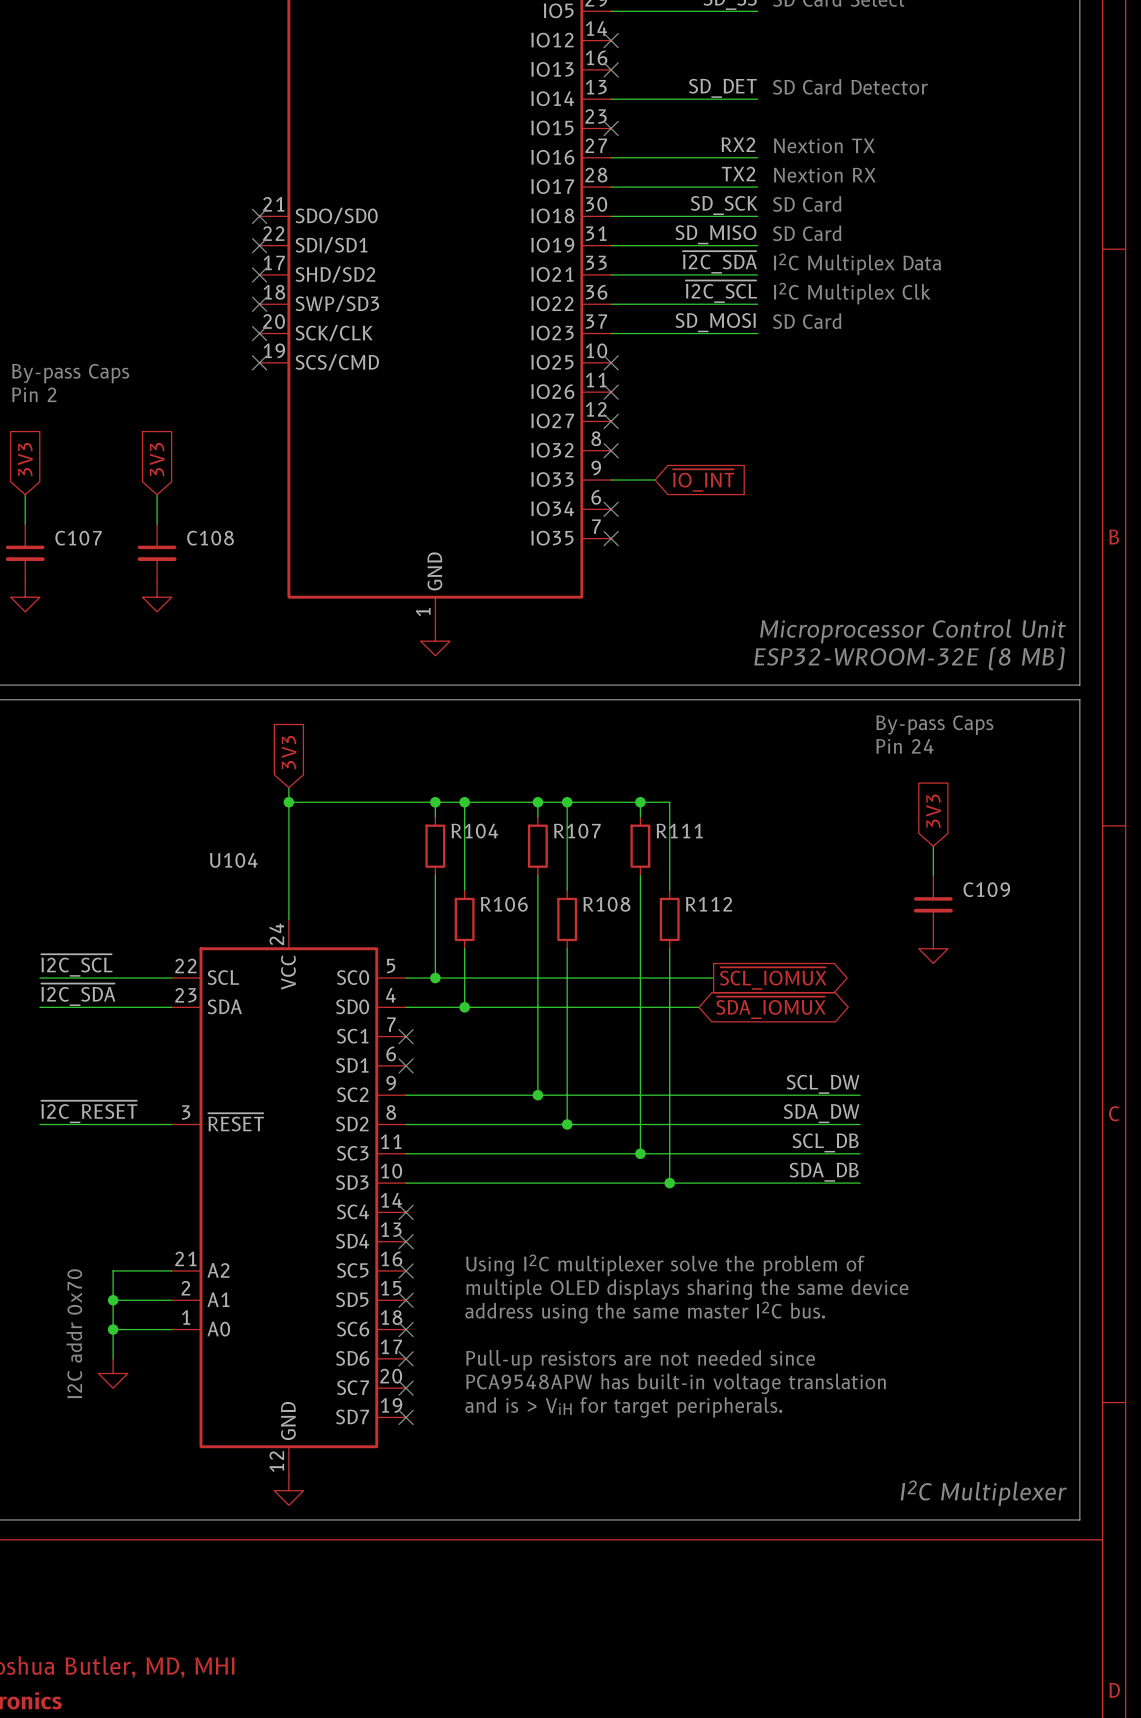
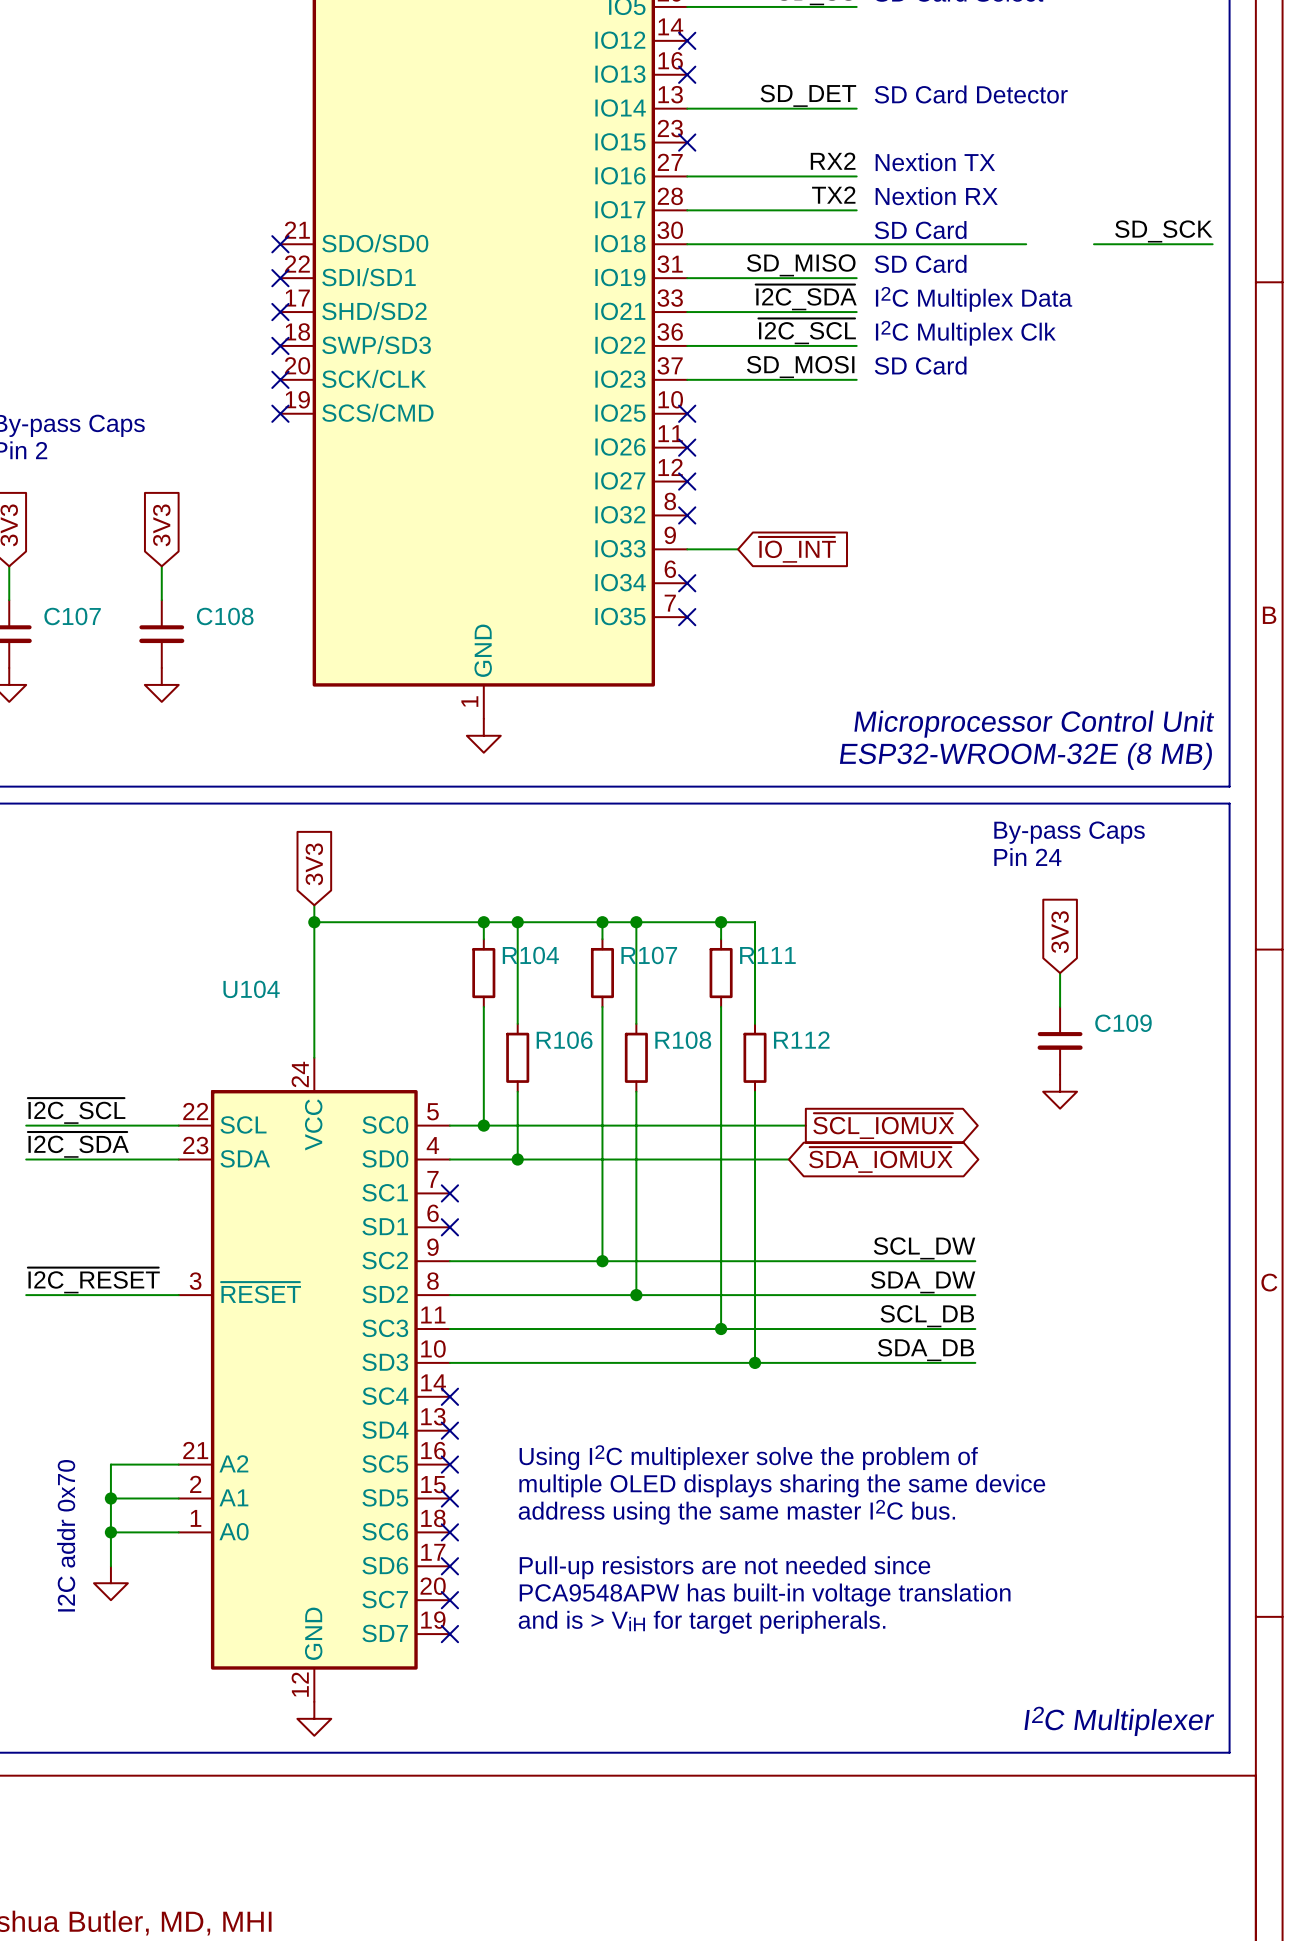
label: SD_SCK (724, 205) -> none
label: none -> SD_SCK (1163, 231)
wire: none -> (856, 244) (1026, 244)
wire: none -> (1093, 244) (1212, 244)

